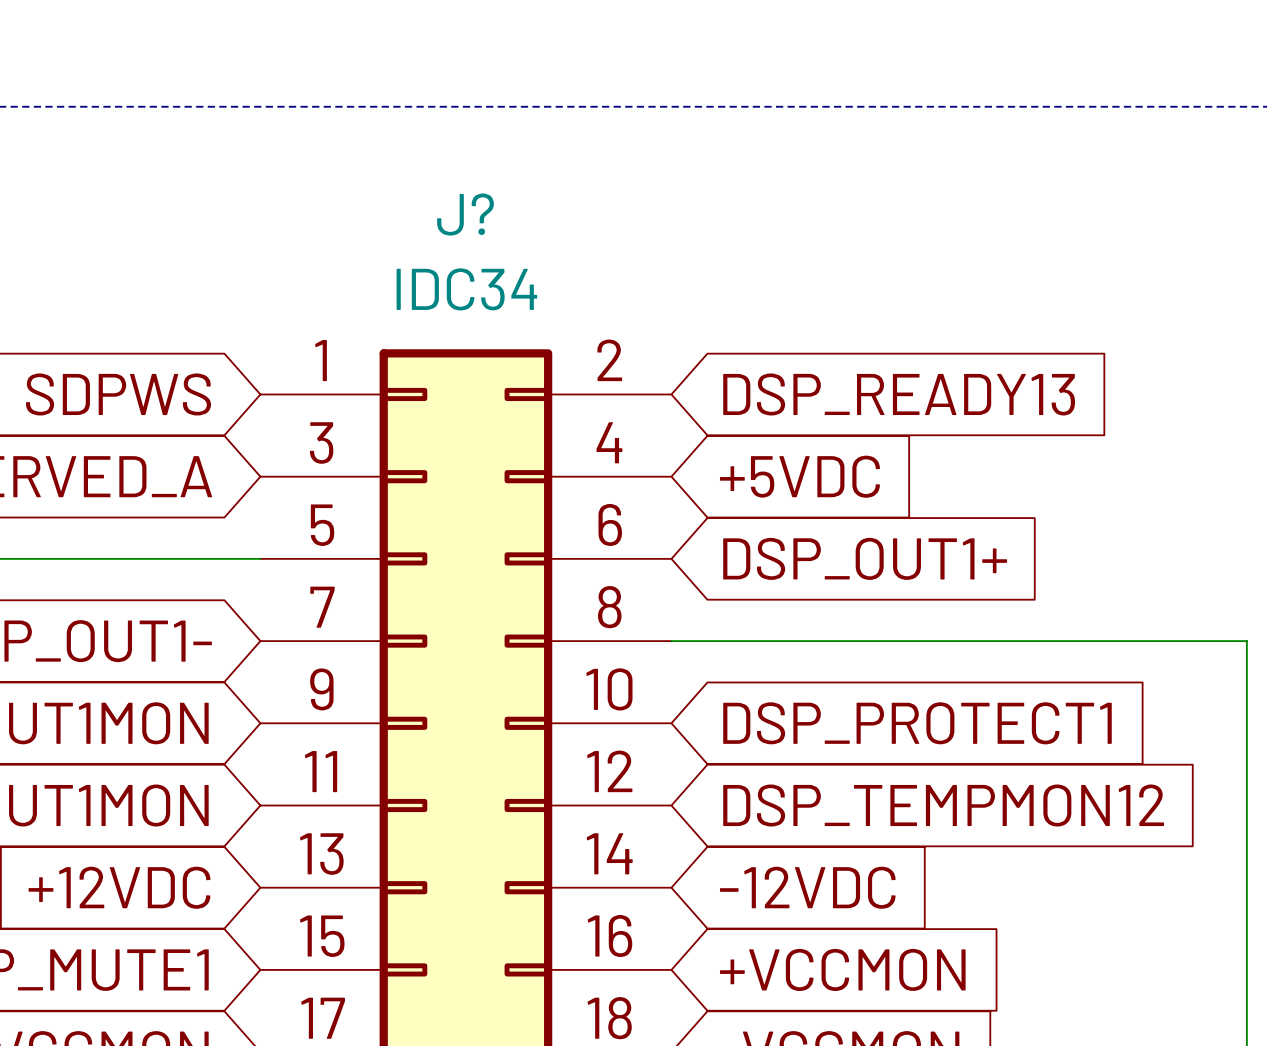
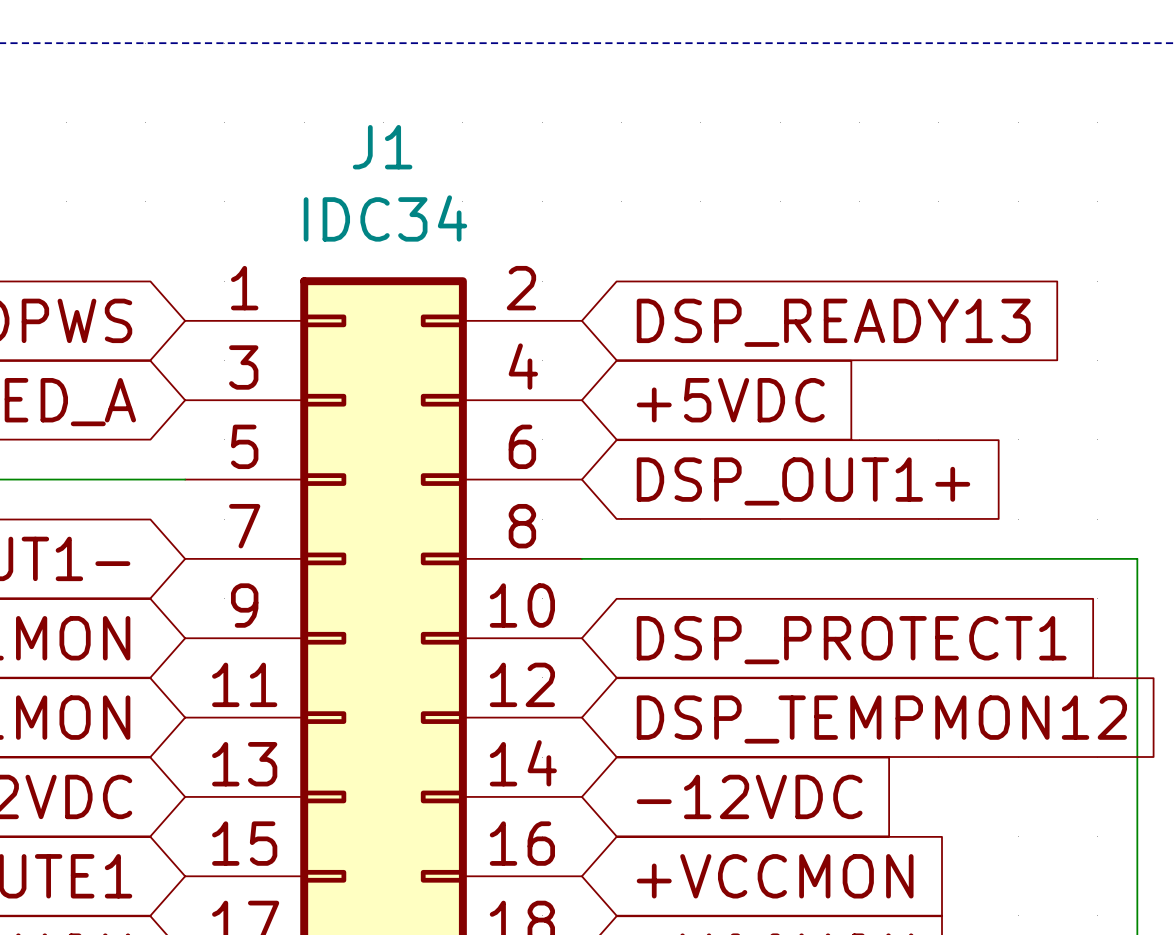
J? name: J? (465, 214) -> J1 (382, 147)

